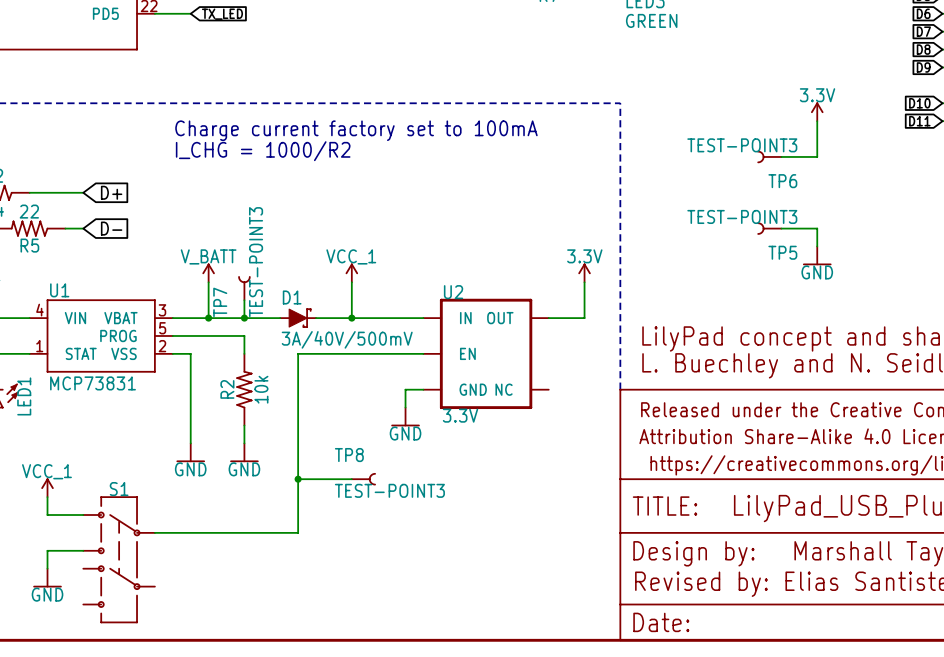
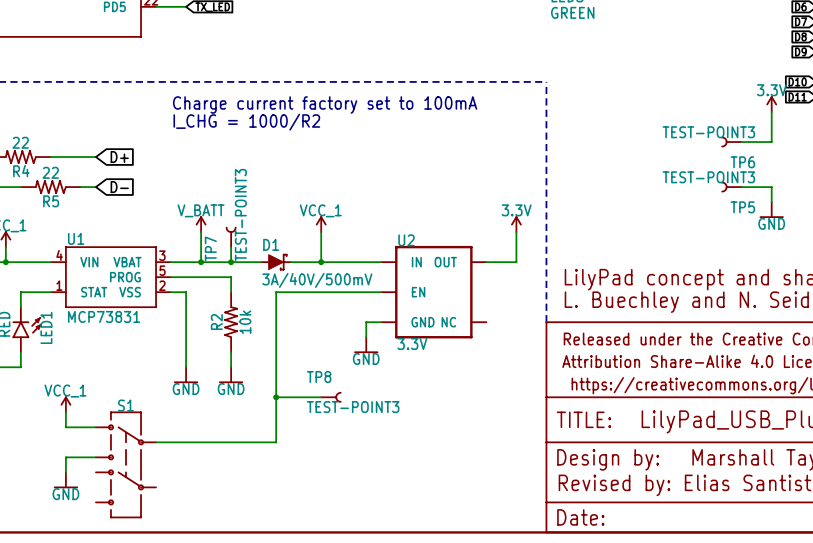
power symbol position: 3.3V (817, 111) -> 3.3V (771, 104)
wire: (817, 121) (817, 156) (781, 156) -> (771, 111) (771, 142) (741, 142)
TP6 position: (769, 156) -> (731, 142)
TP5 position: (769, 228) -> (731, 187)
wire: (781, 228) (817, 228) (817, 246) -> (741, 187) (771, 187) (771, 202)
power symbol position: GND (817, 255) -> GND (771, 209)

